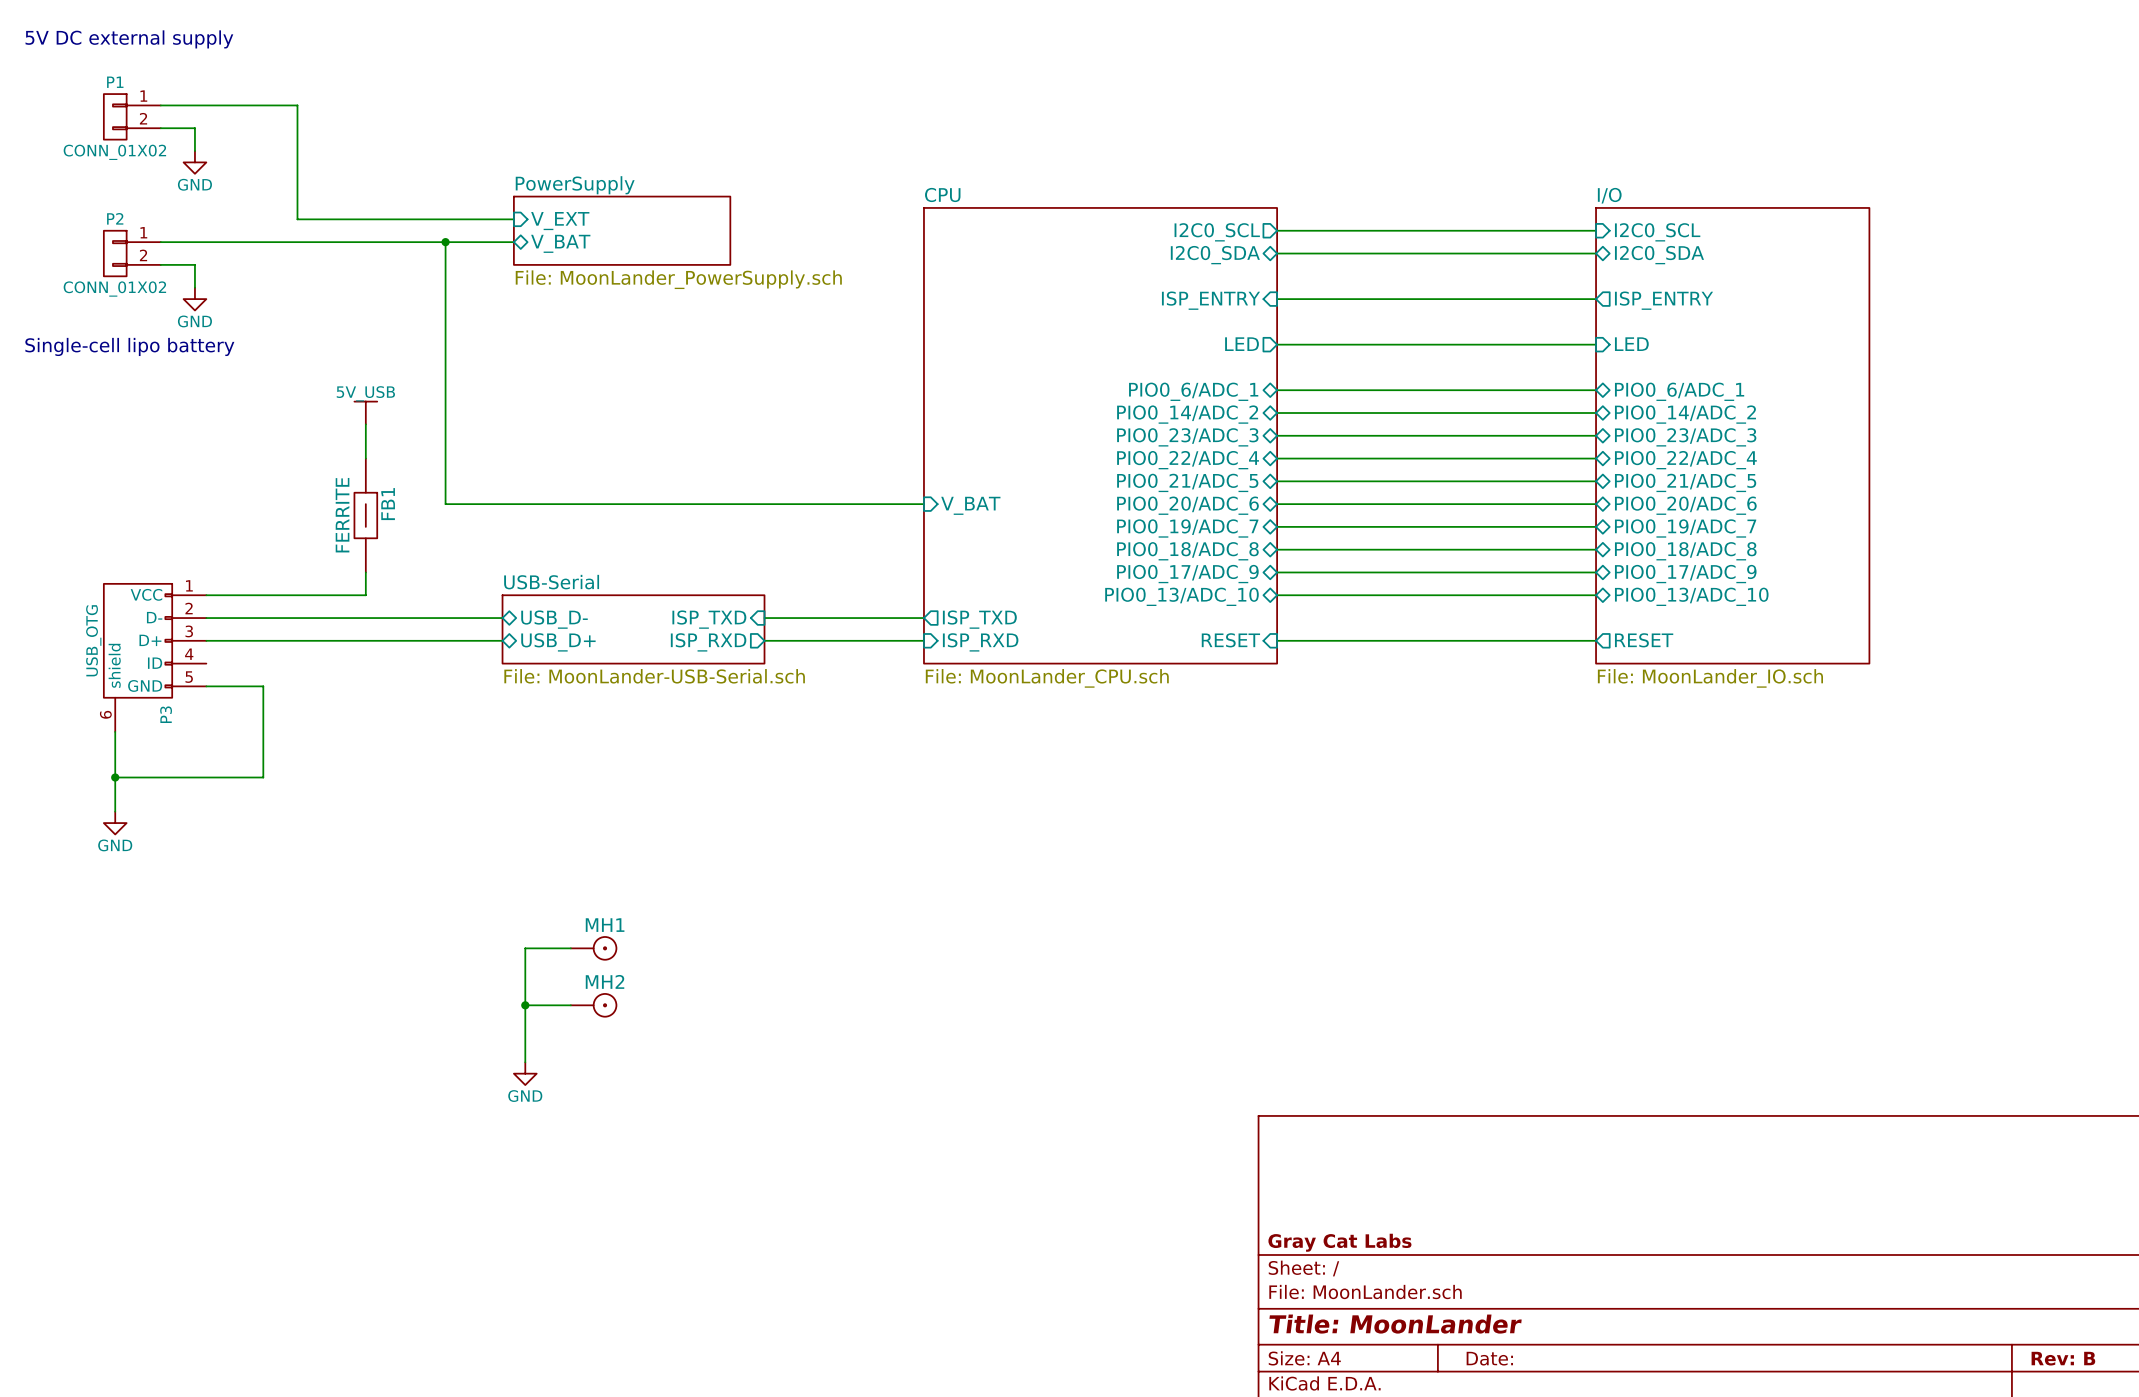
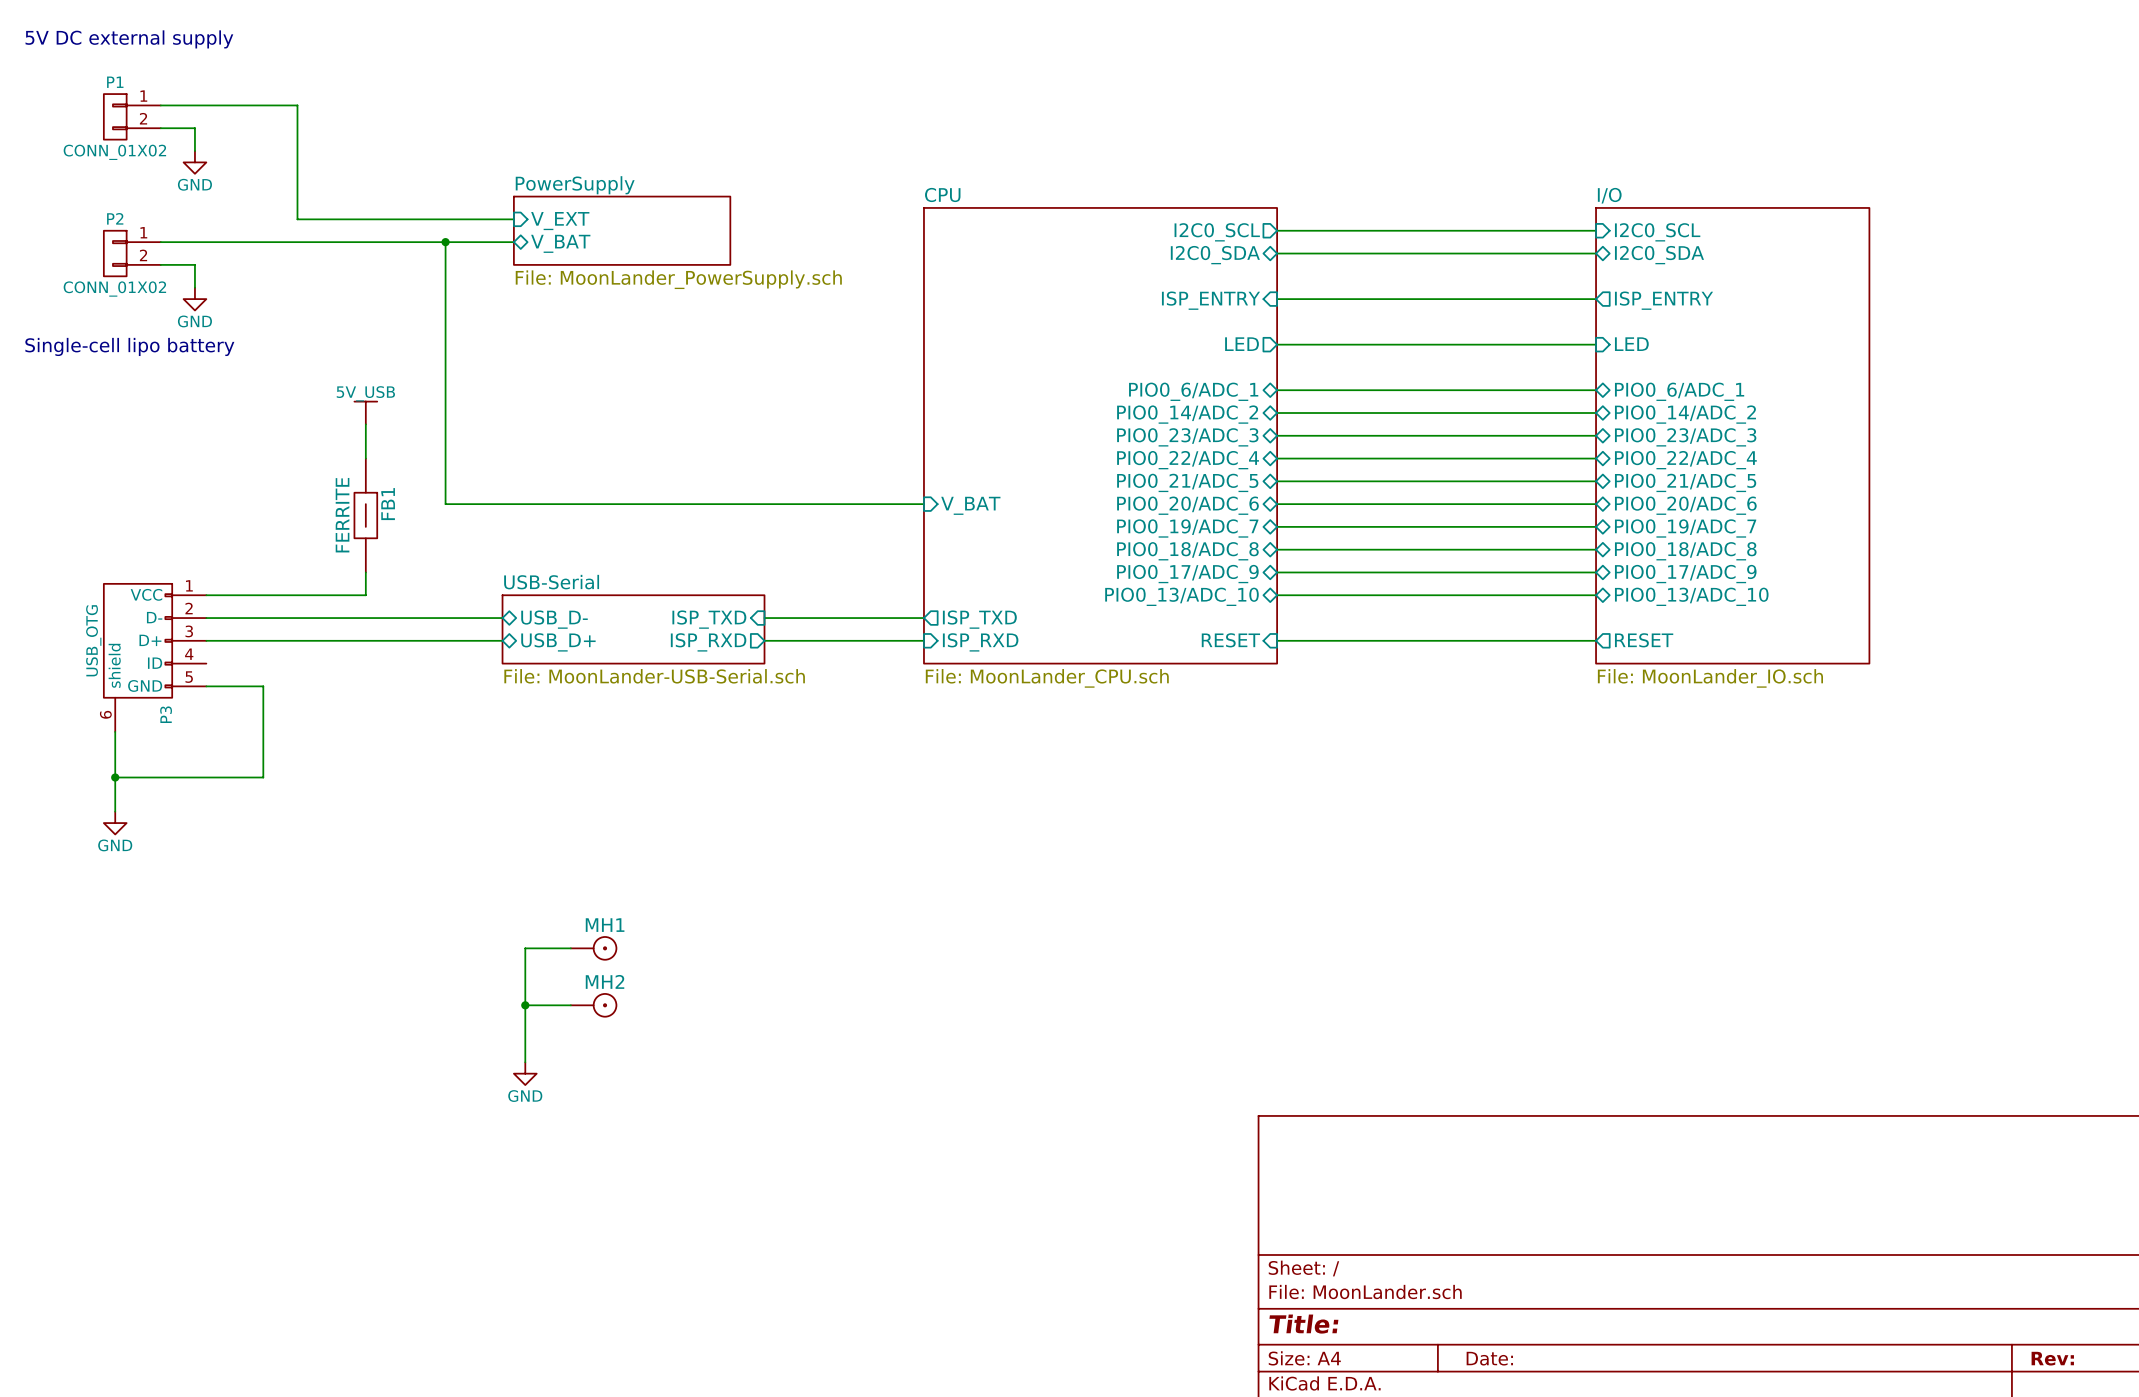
title block: Gray Cat Labs (1339, 1242) -> none
title block: Title: MoonLander (1395, 1324) -> Title: (1303, 1324)
title block: Rev: B (2063, 1358) -> Rev: (2052, 1358)

